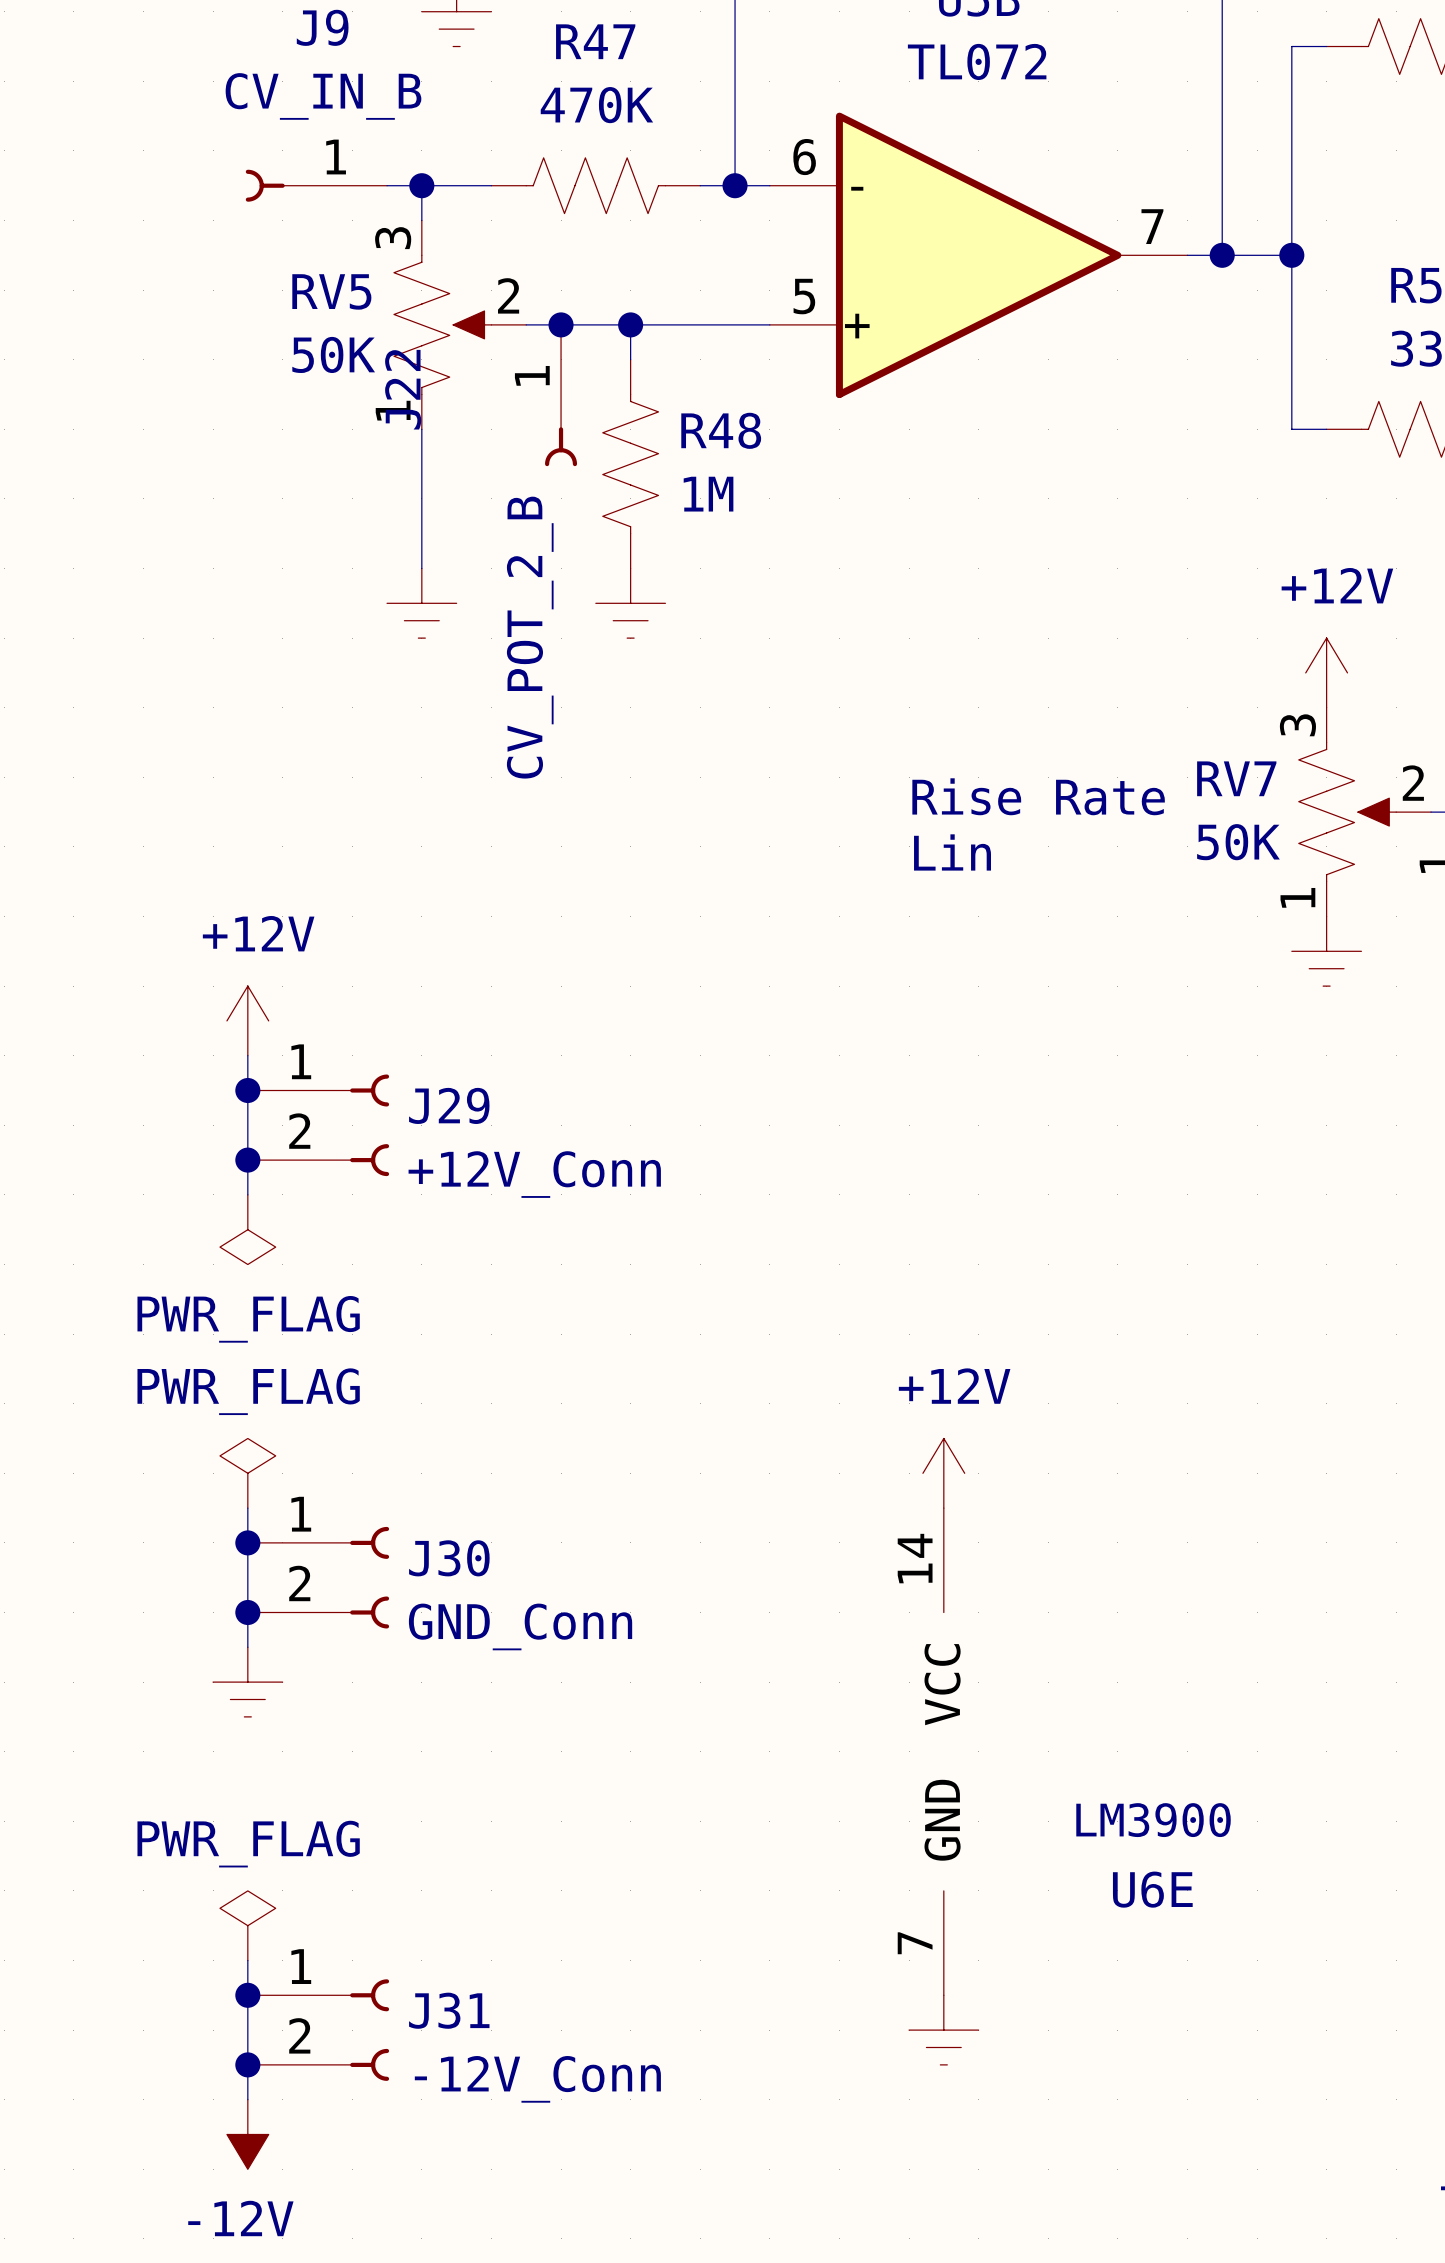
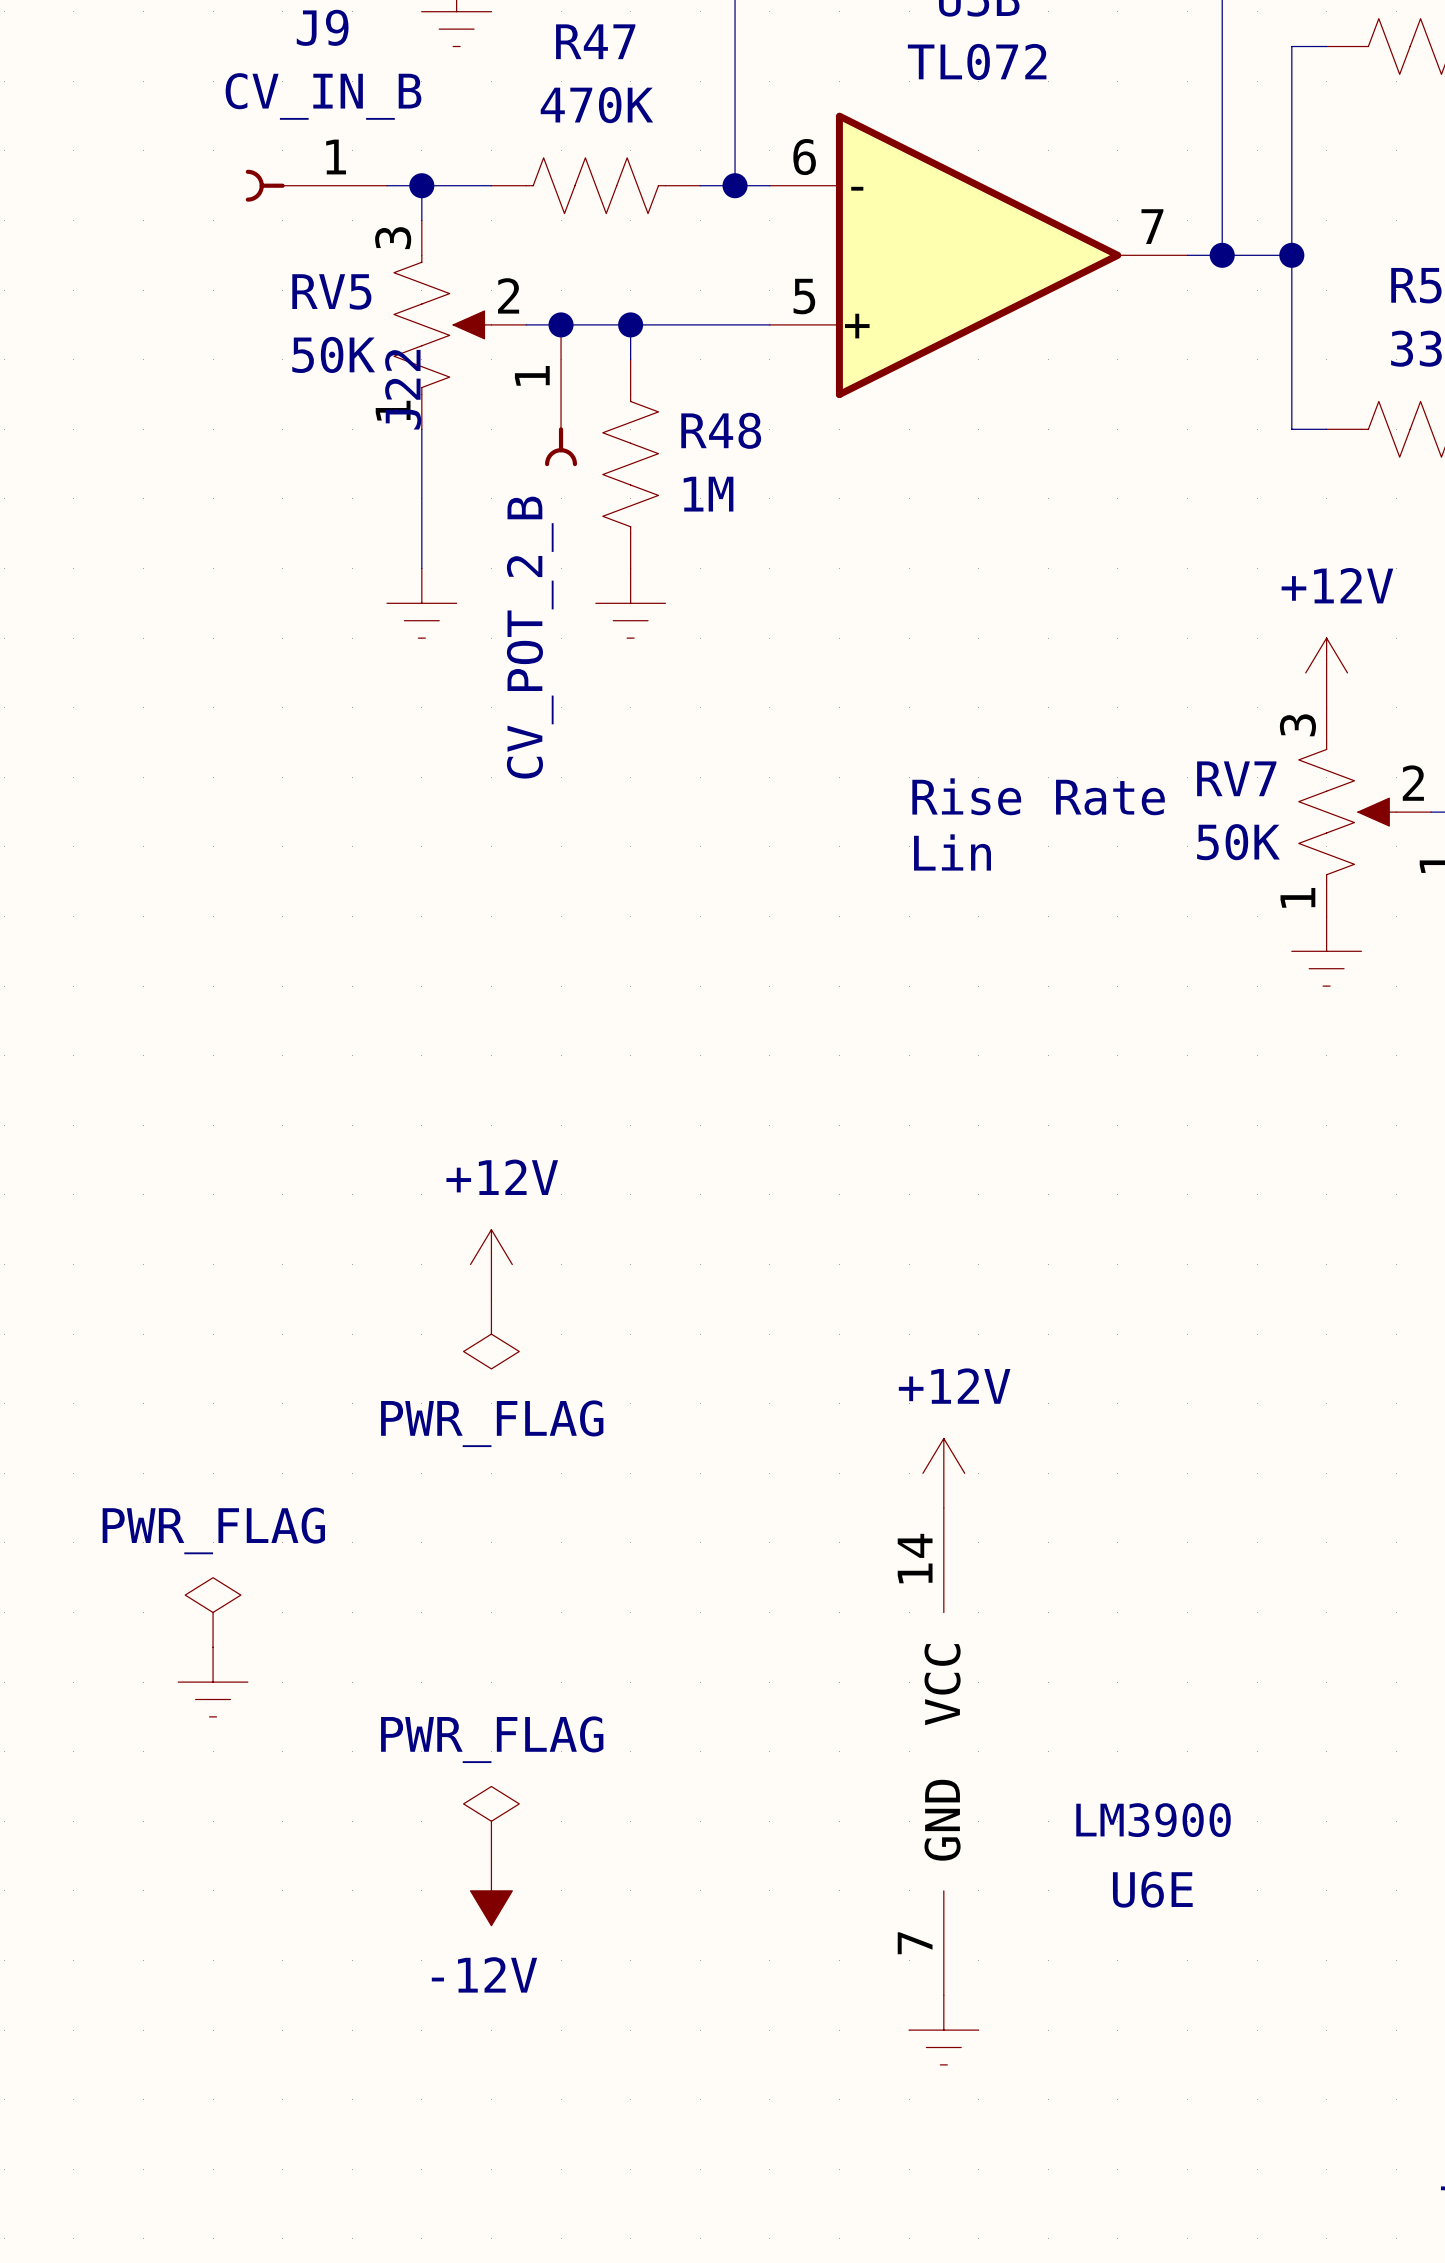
power symbol position: +12V (247, 1020) -> +12V (491, 1264)
wire: (247, 1055) (247, 1194) -> none
junction: (247, 1090) -> none
J29: +12V_Conn (318, 1125) -> none
junction: (247, 1160) -> none
power symbol: PWR_FLAG (247, 1229) -> none
power symbol: none -> PWR_FLAG (491, 1334)
power symbol: PWR_FLAG (247, 1473) -> none
wire: (247, 1508) (247, 1647) -> none
junction: (247, 1542) -> none
J30: GND_Conn (318, 1577) -> none
power symbol: none -> PWR_FLAG (213, 1612)
junction: (247, 1612) -> none
power symbol position: (247, 1682) -> (213, 1682)
power symbol: none -> PWR_FLAG (491, 1821)
power symbol: PWR_FLAG (247, 1925) -> none
wire: (247, 1960) (247, 2099) -> none
junction: (247, 1995) -> none
J31: -12V_Conn (318, 2030) -> none
junction: (247, 2064) -> none
power symbol position: -12V (247, 2134) -> -12V (491, 1890)

